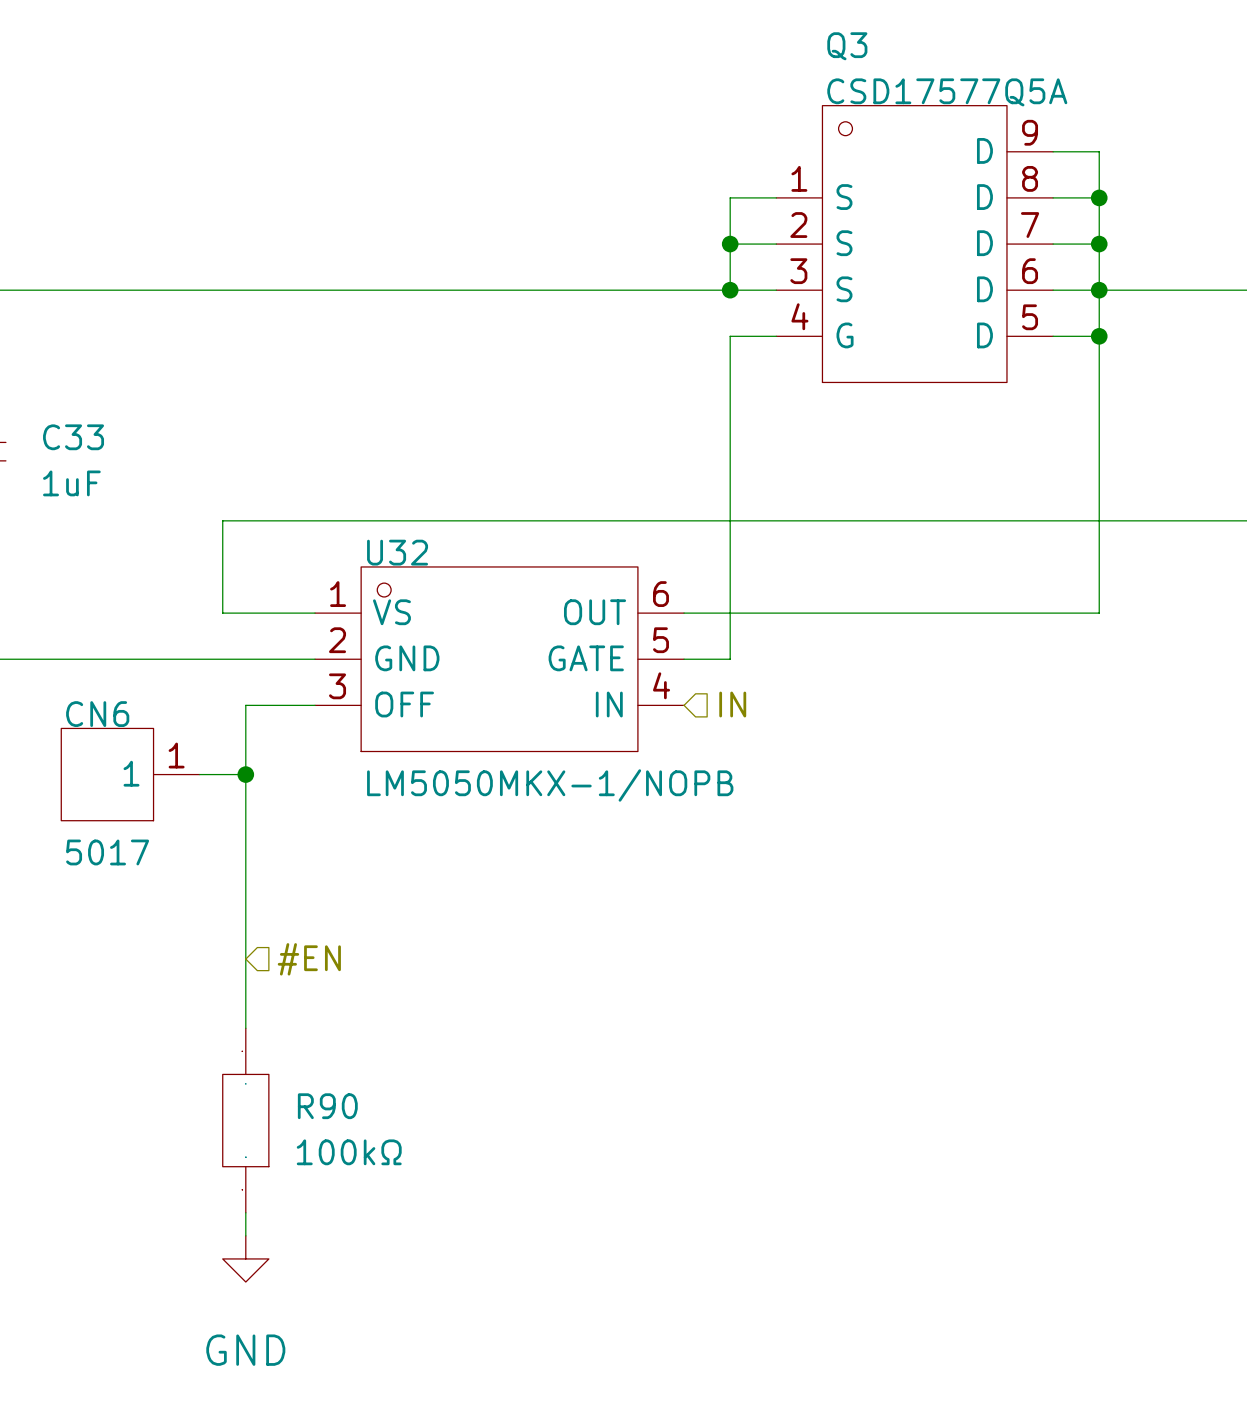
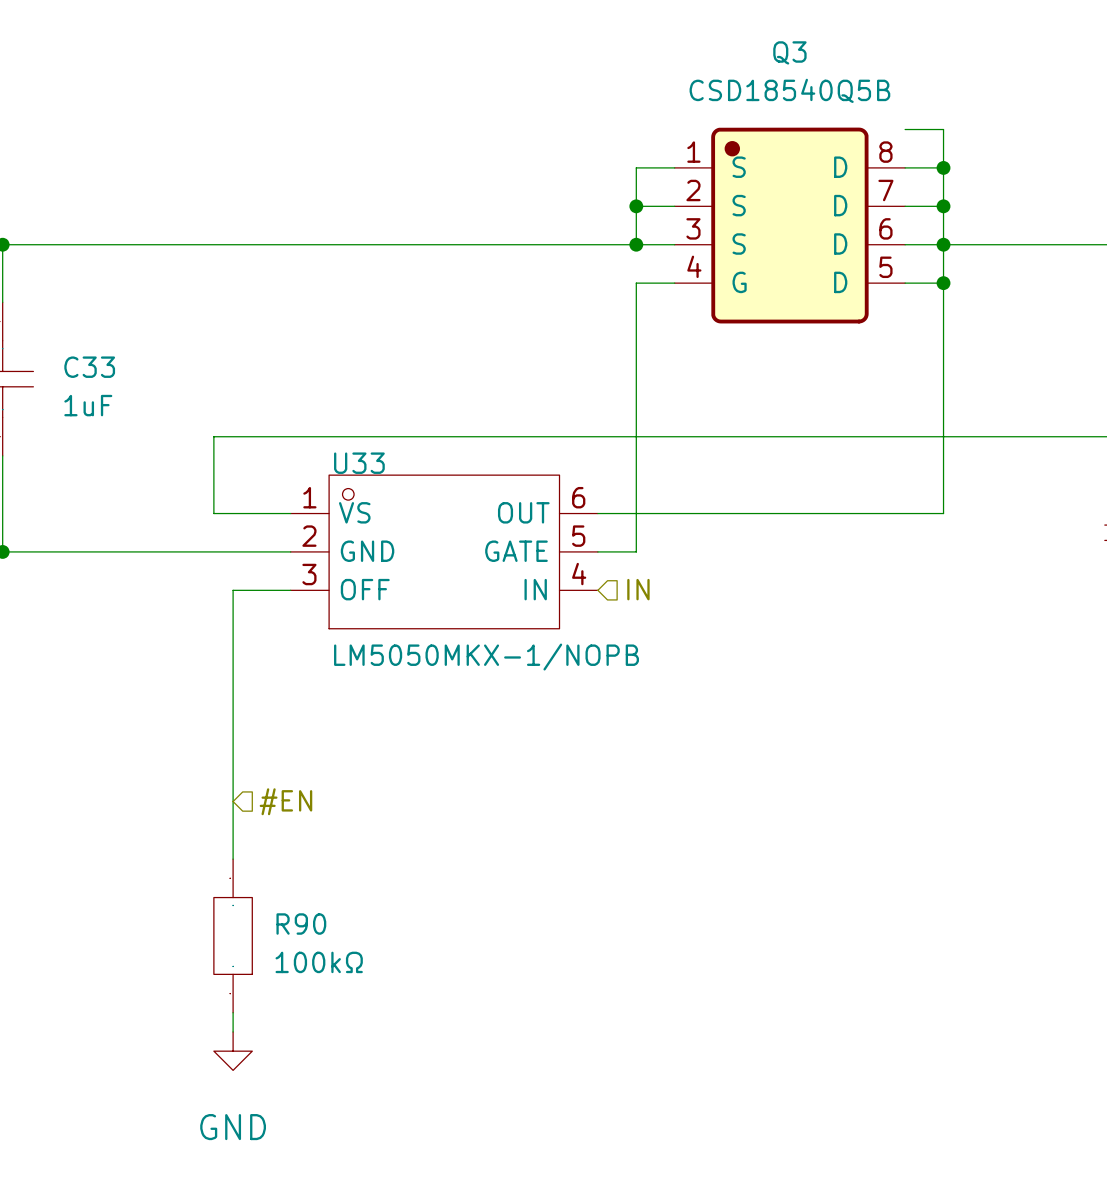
Q3 name position: Q3 (847, 46) -> Q3 (789, 52)
Q3 value: CSD17577Q5A (947, 92) -> CSD18540Q5B (789, 90)
Q3 symbol: [776, 105, 1054, 383] -> [674, 127, 906, 324]
U32 name: U32 (397, 552) -> U33 (359, 463)
CN6: 5017 (130, 774) -> none
wire: (199, 774) (245, 774) -> none
junction: (245, 774) -> none

